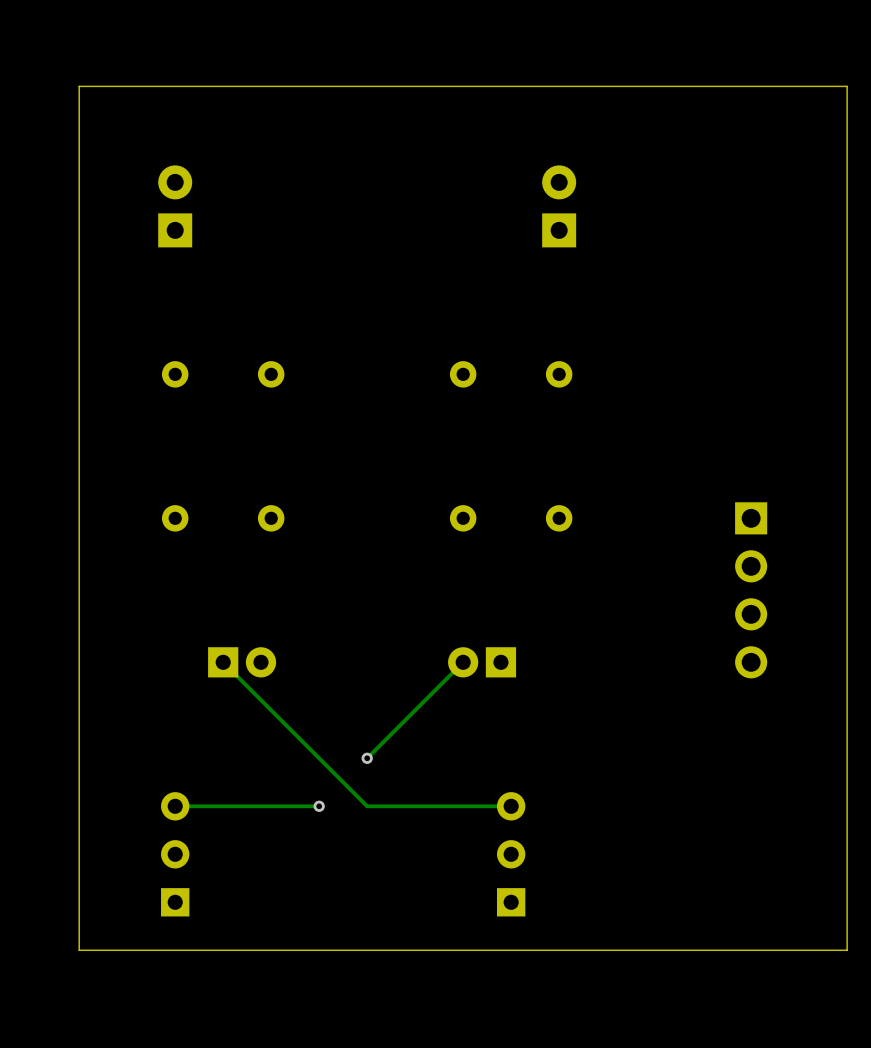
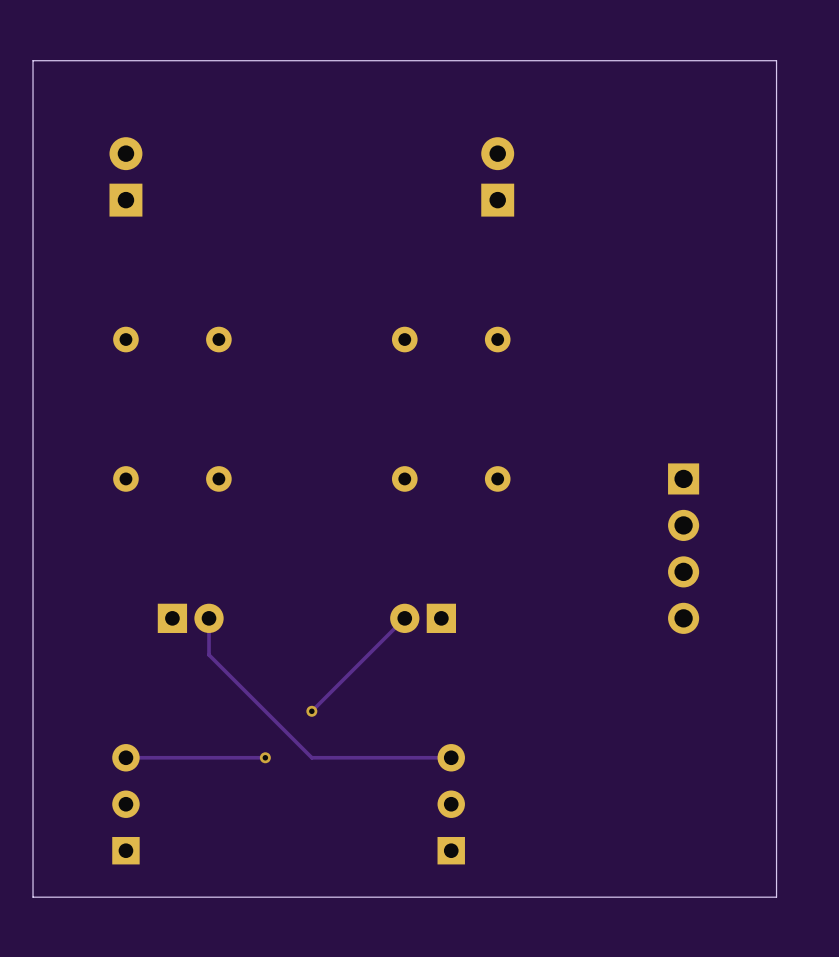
track: (223, 662) (260, 700) -> (209, 618) (209, 654)

